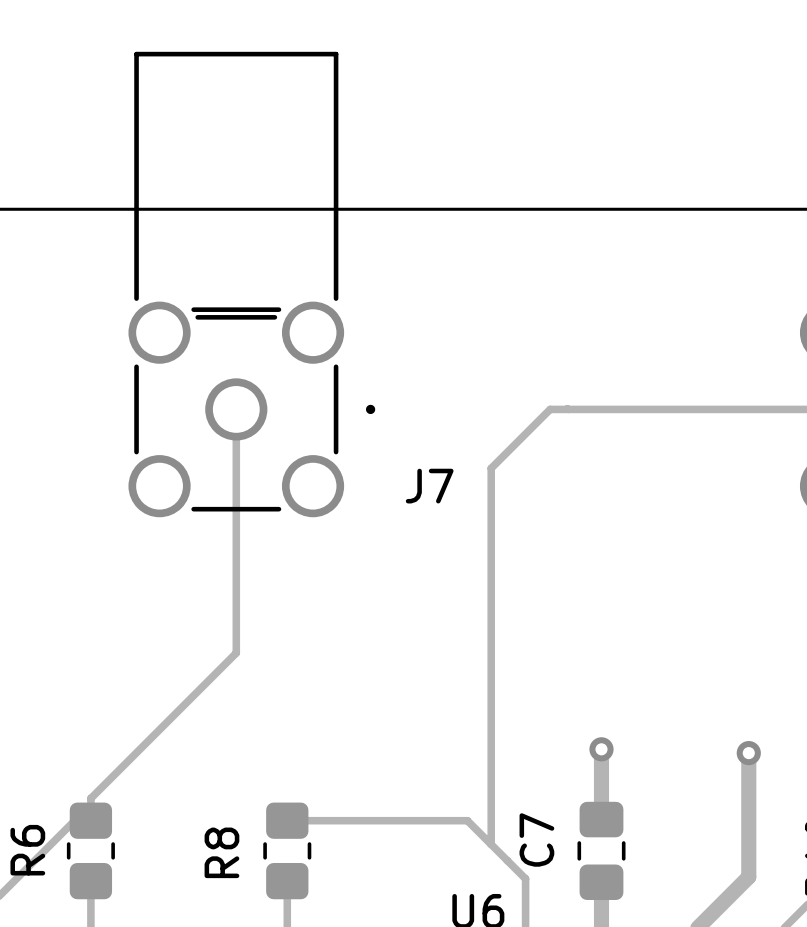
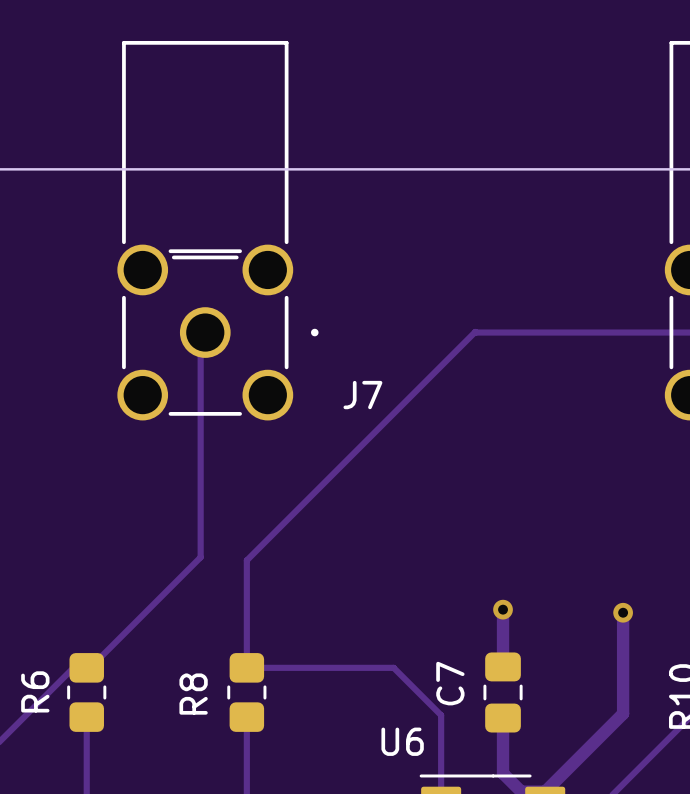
track: none -> (200, 332) (200, 557) (90, 667)
track: (236, 409) (236, 653) (90, 798) (90, 820) -> none
track: (568, 409) (550, 409) (491, 468) (491, 843) -> (475, 331) (246, 560) (246, 667)

